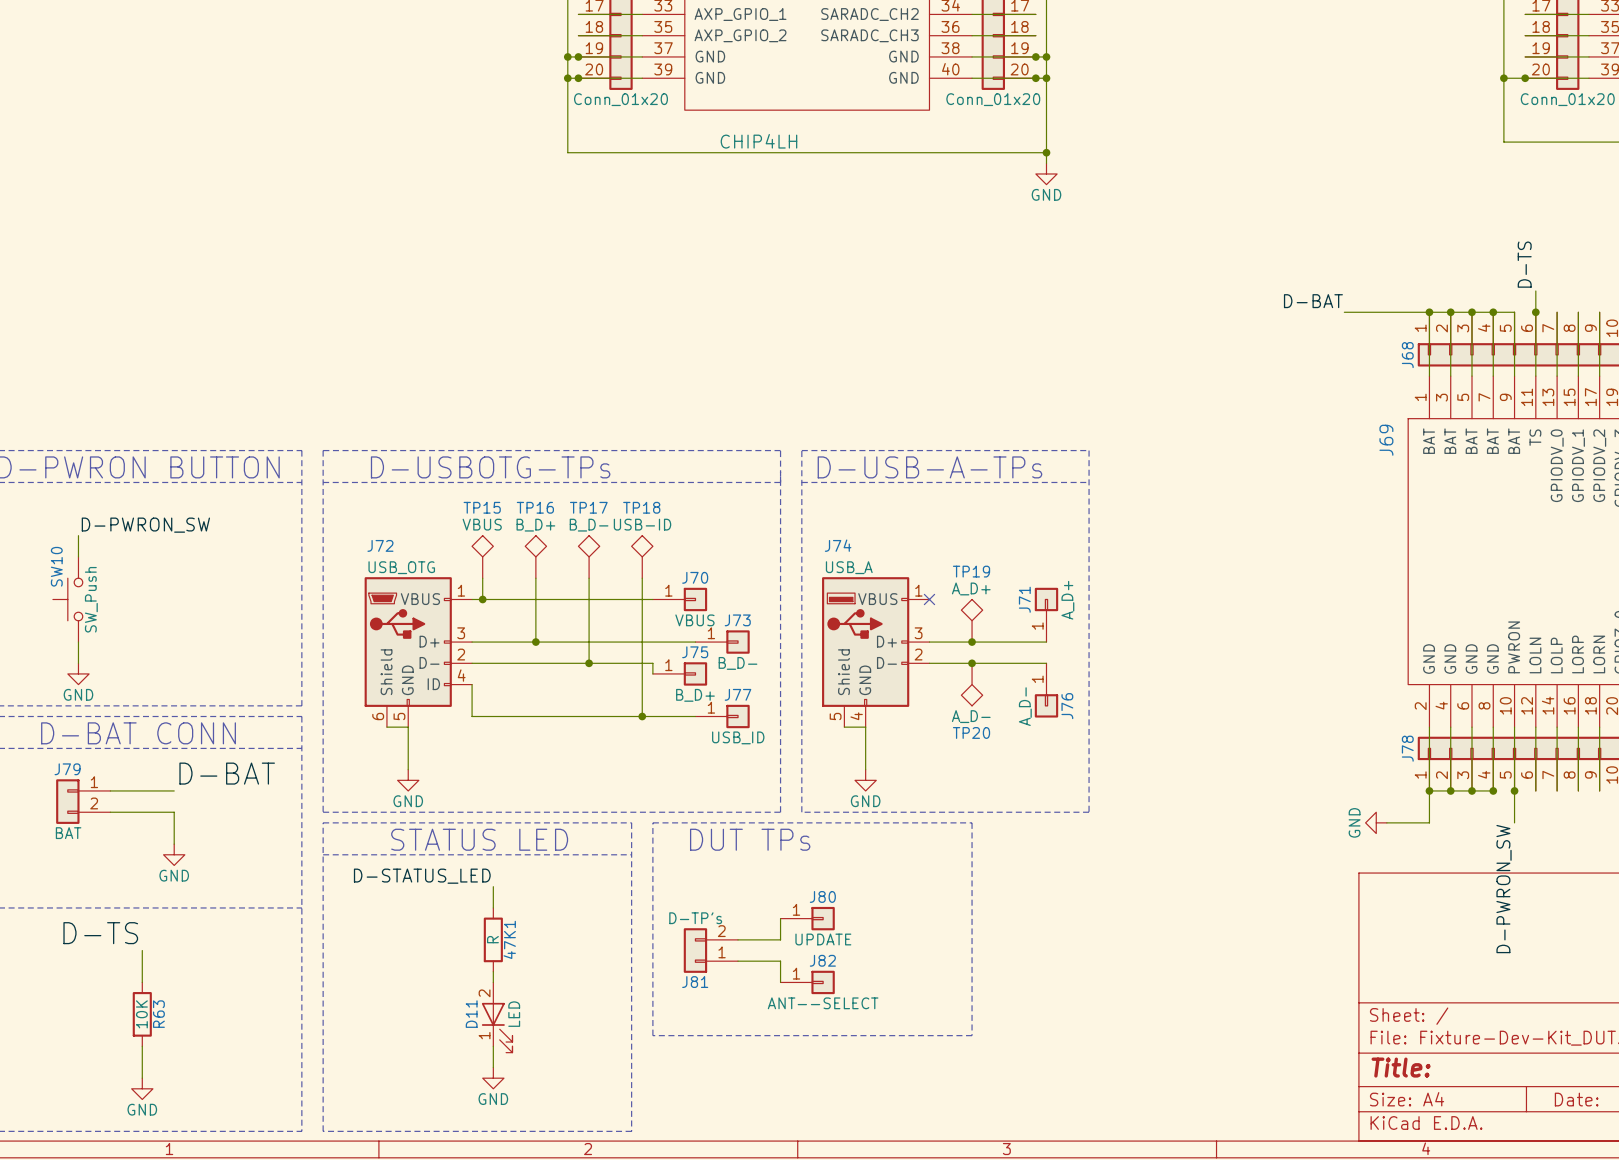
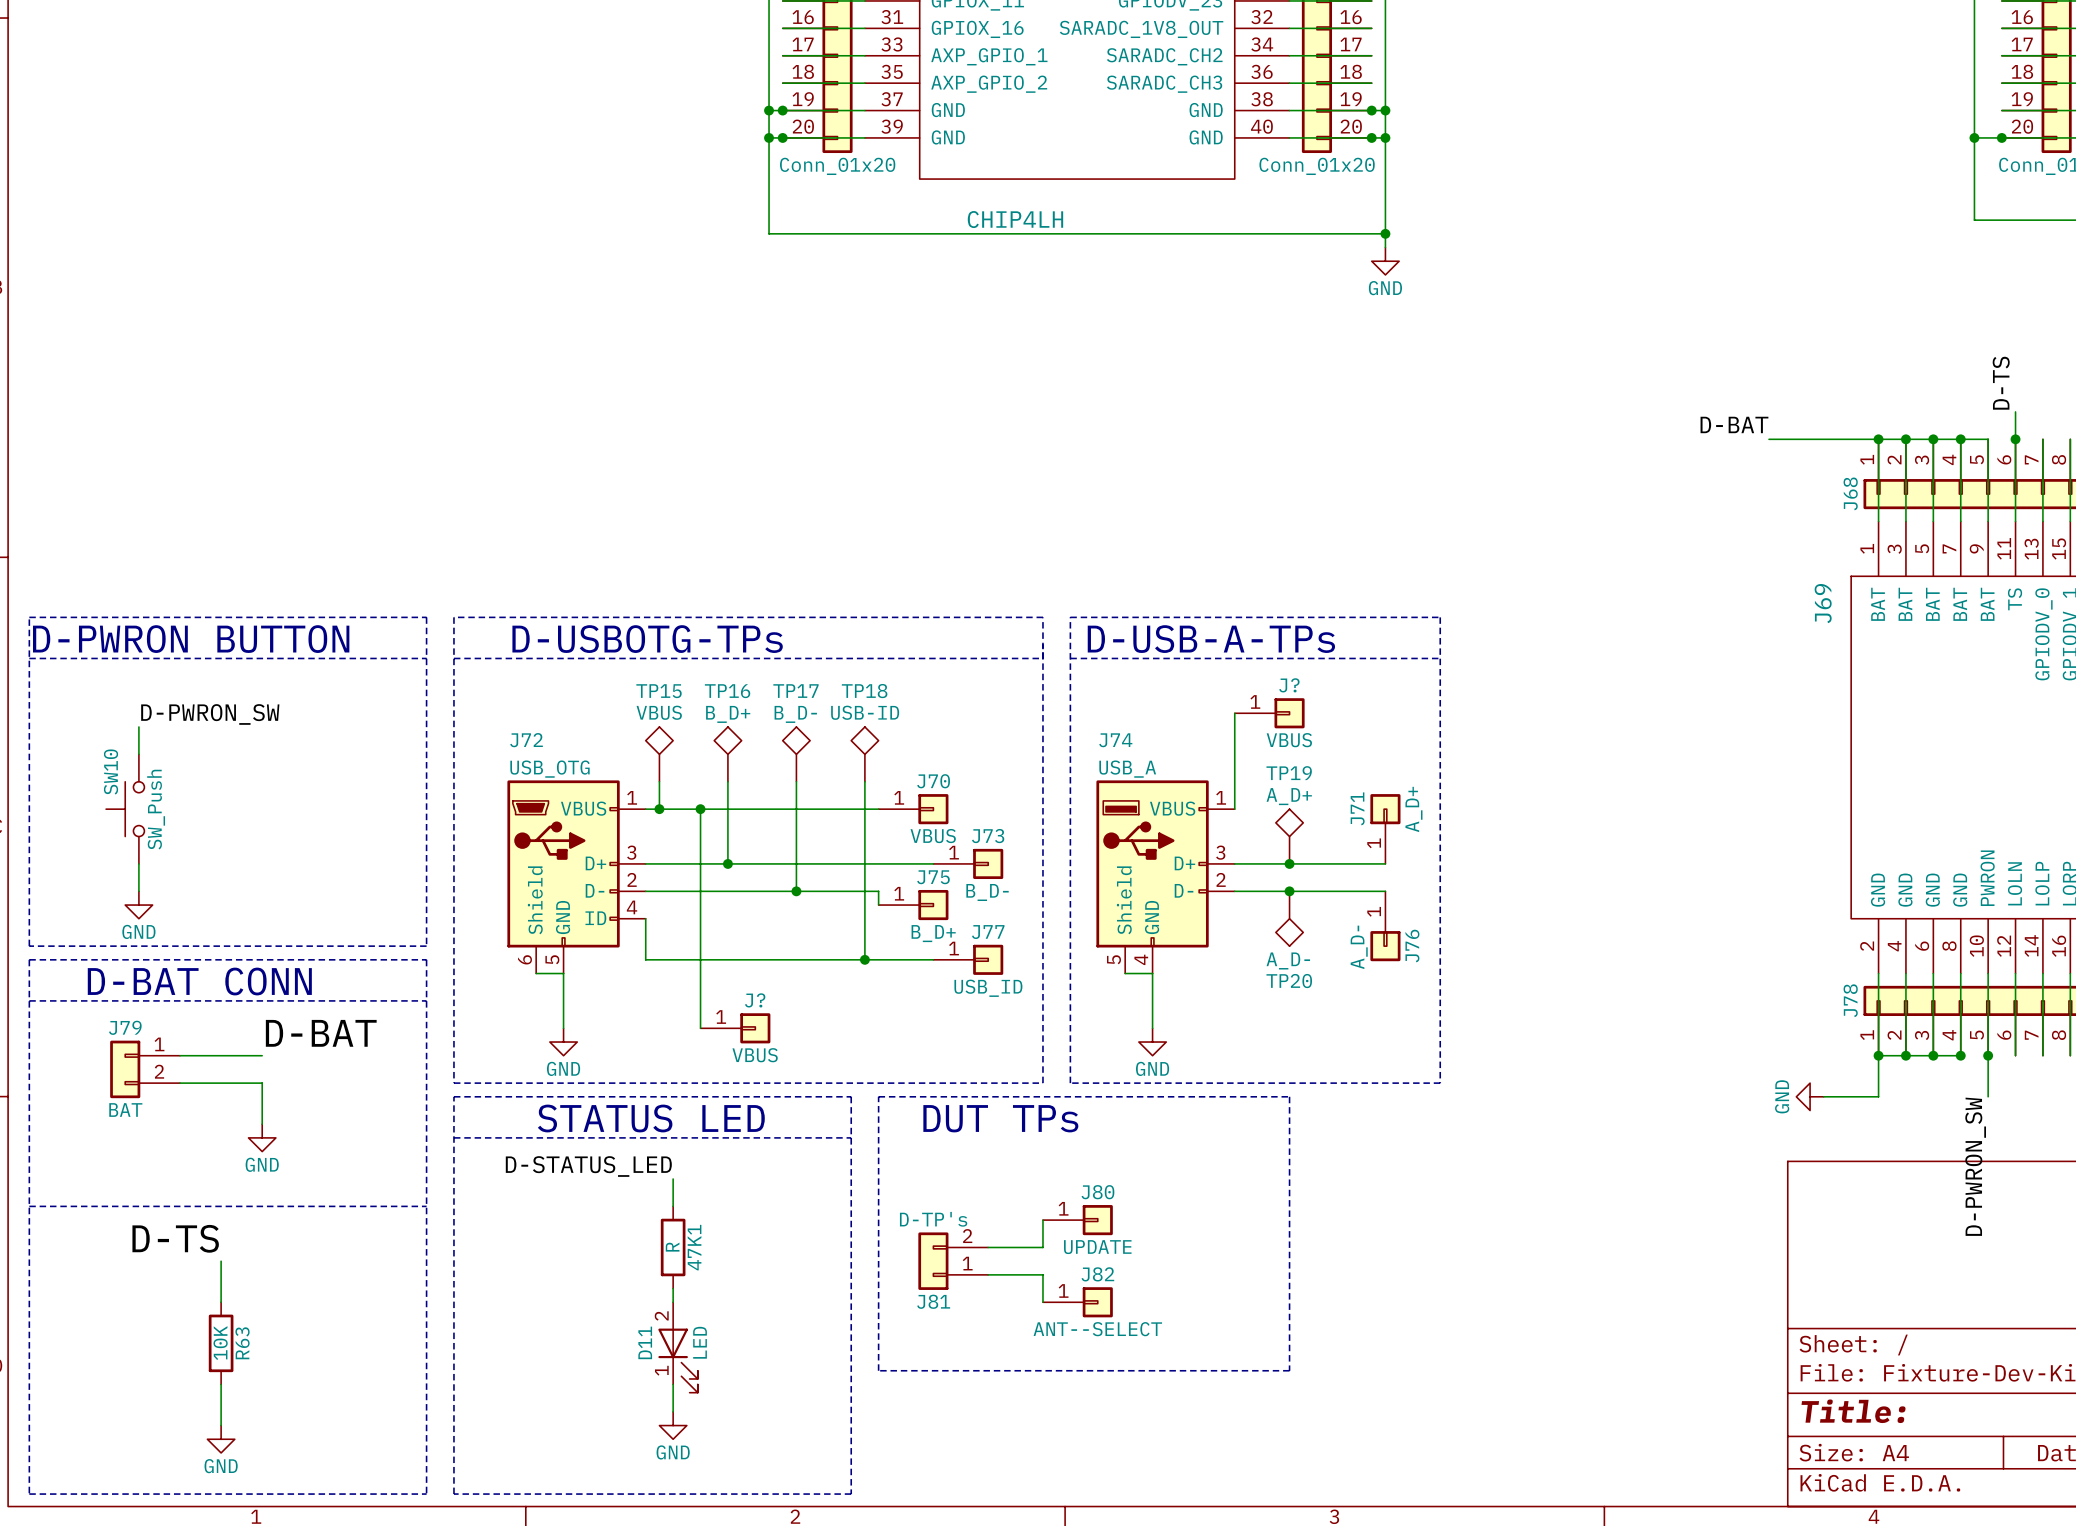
wire: none -> (1234, 713) (1234, 809)
J?: none -> VBUS (1269, 713)
wire: none -> (700, 809) (700, 1028)
junction: none -> (700, 809)
no-connect mark: (929, 599) -> none
J?: none -> VBUS (735, 1028)

